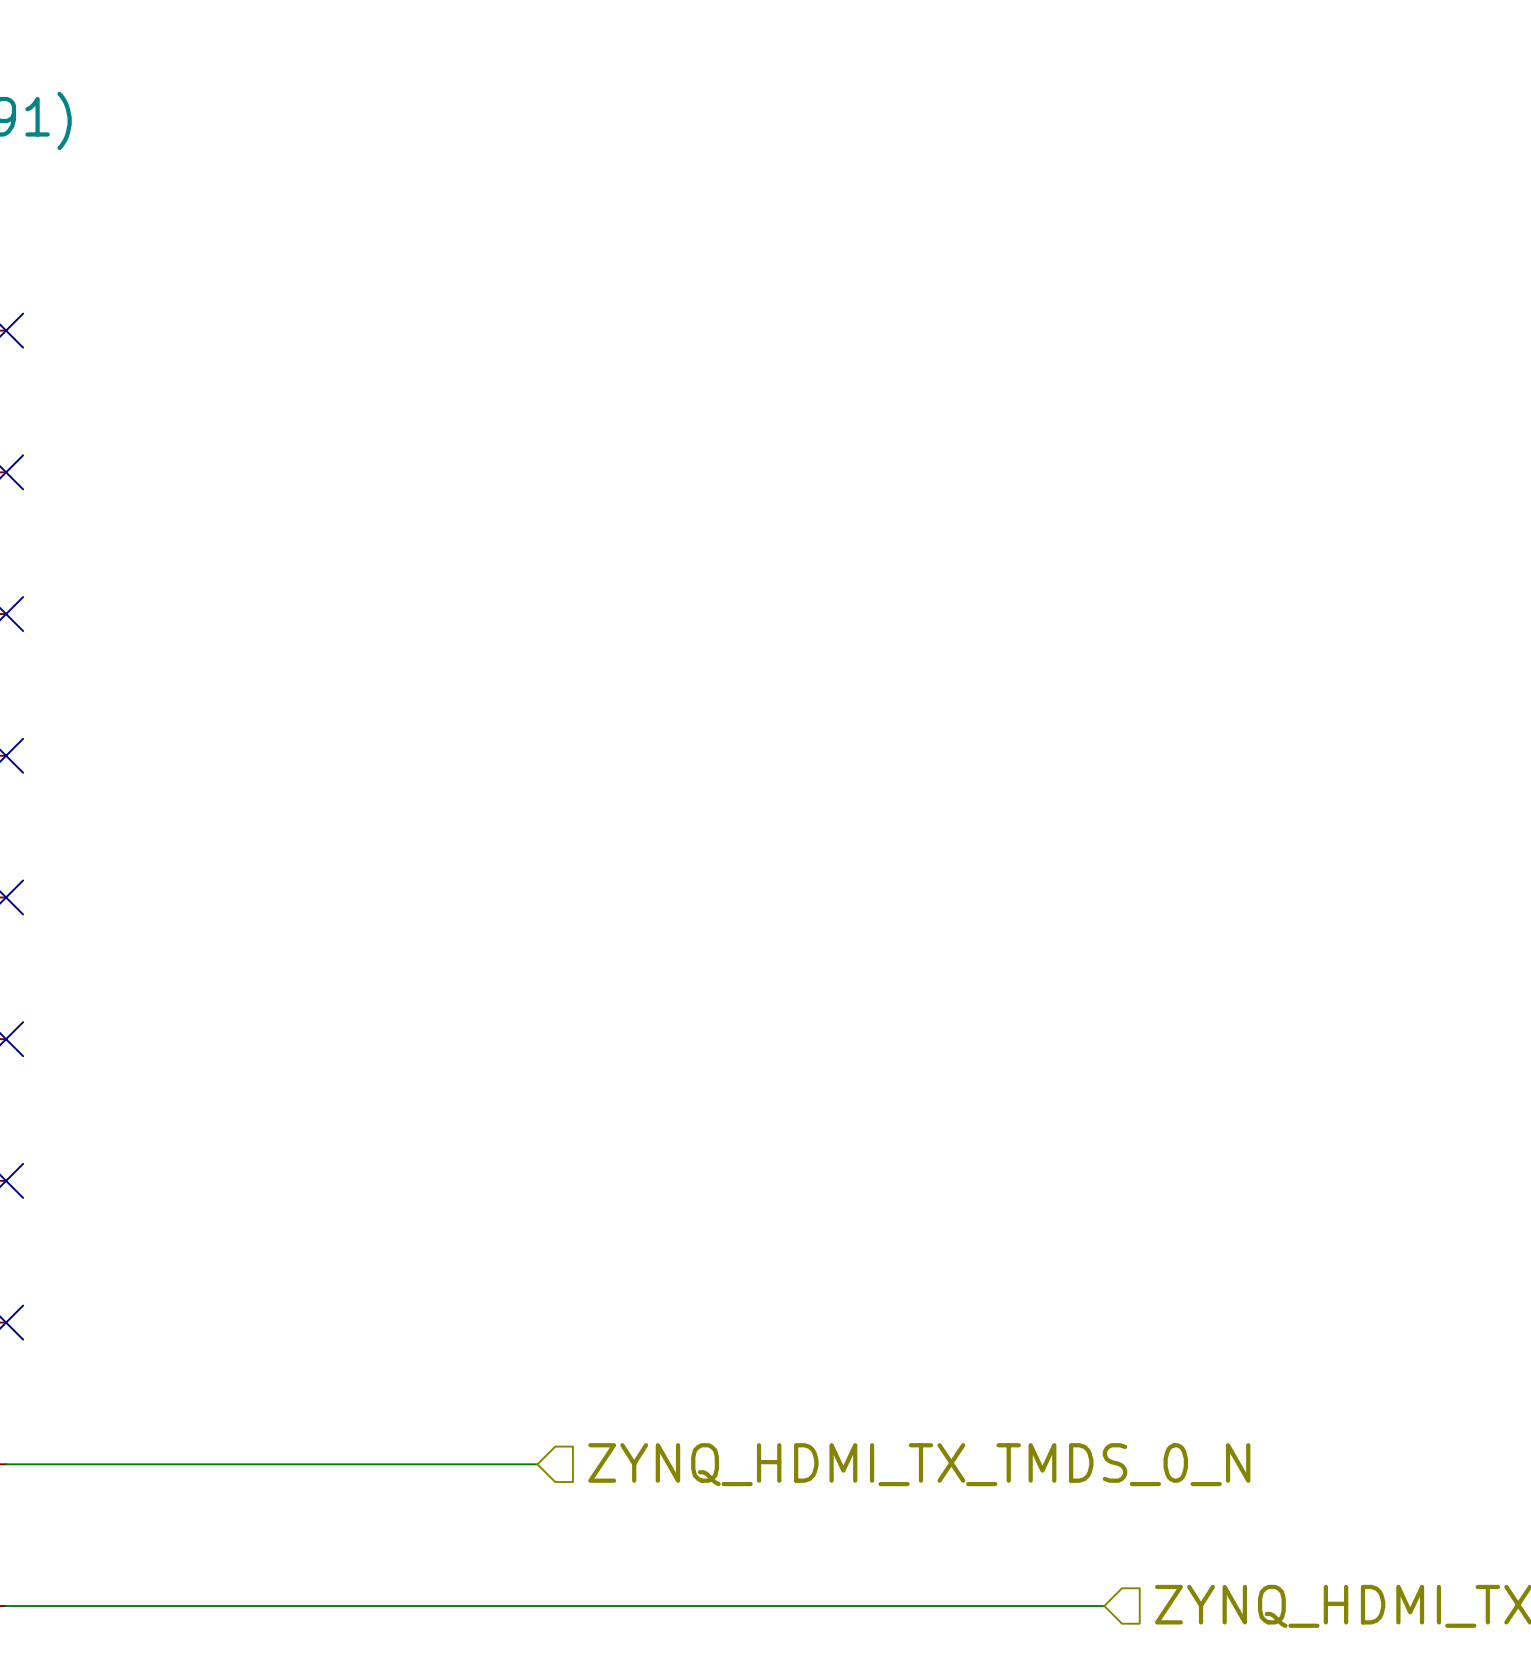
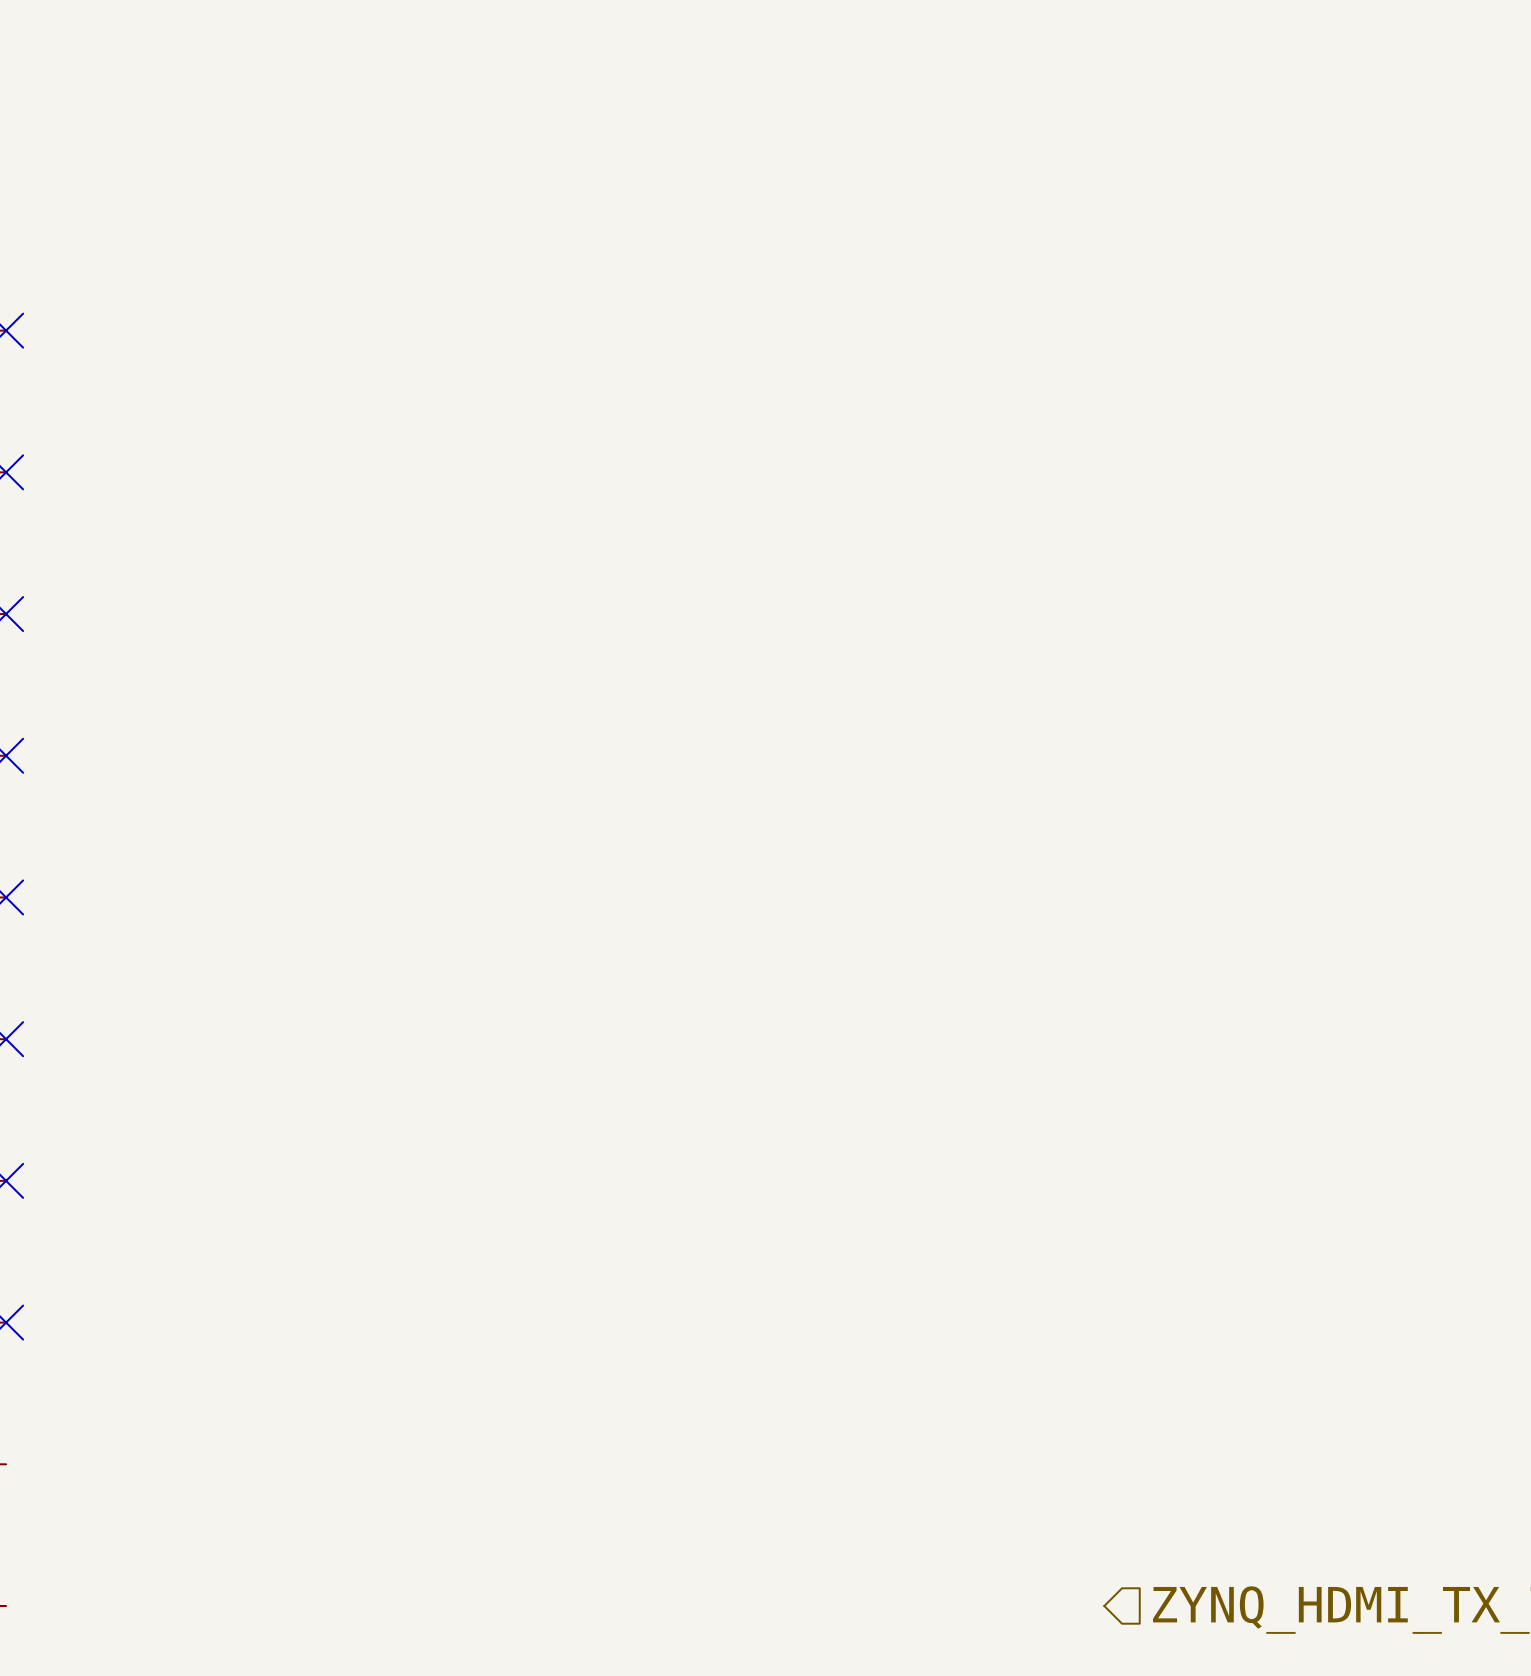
wire: (6, 1464) (537, 1464) -> none
hierarchical label: ZYNQ_HDMI_TX_TMDS_0_N (919, 1464) -> none
wire: (6, 1606) (1104, 1606) -> none

